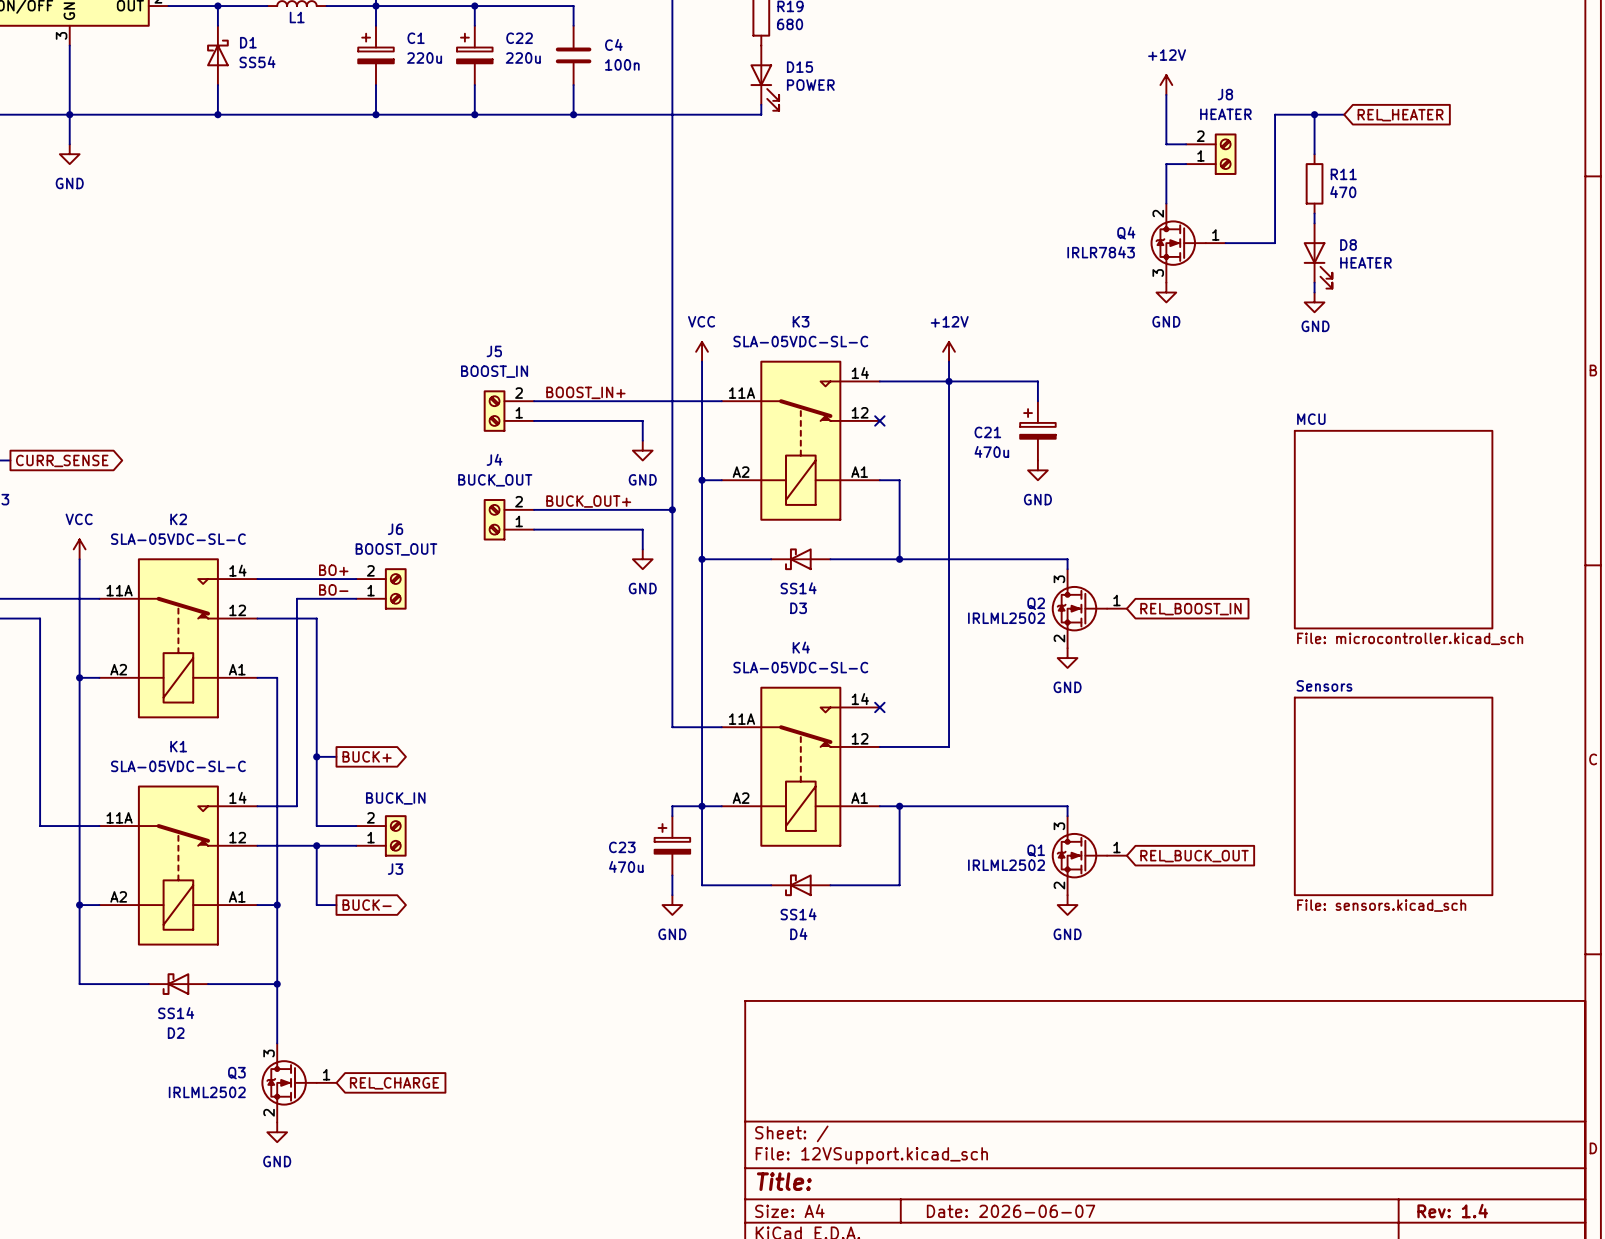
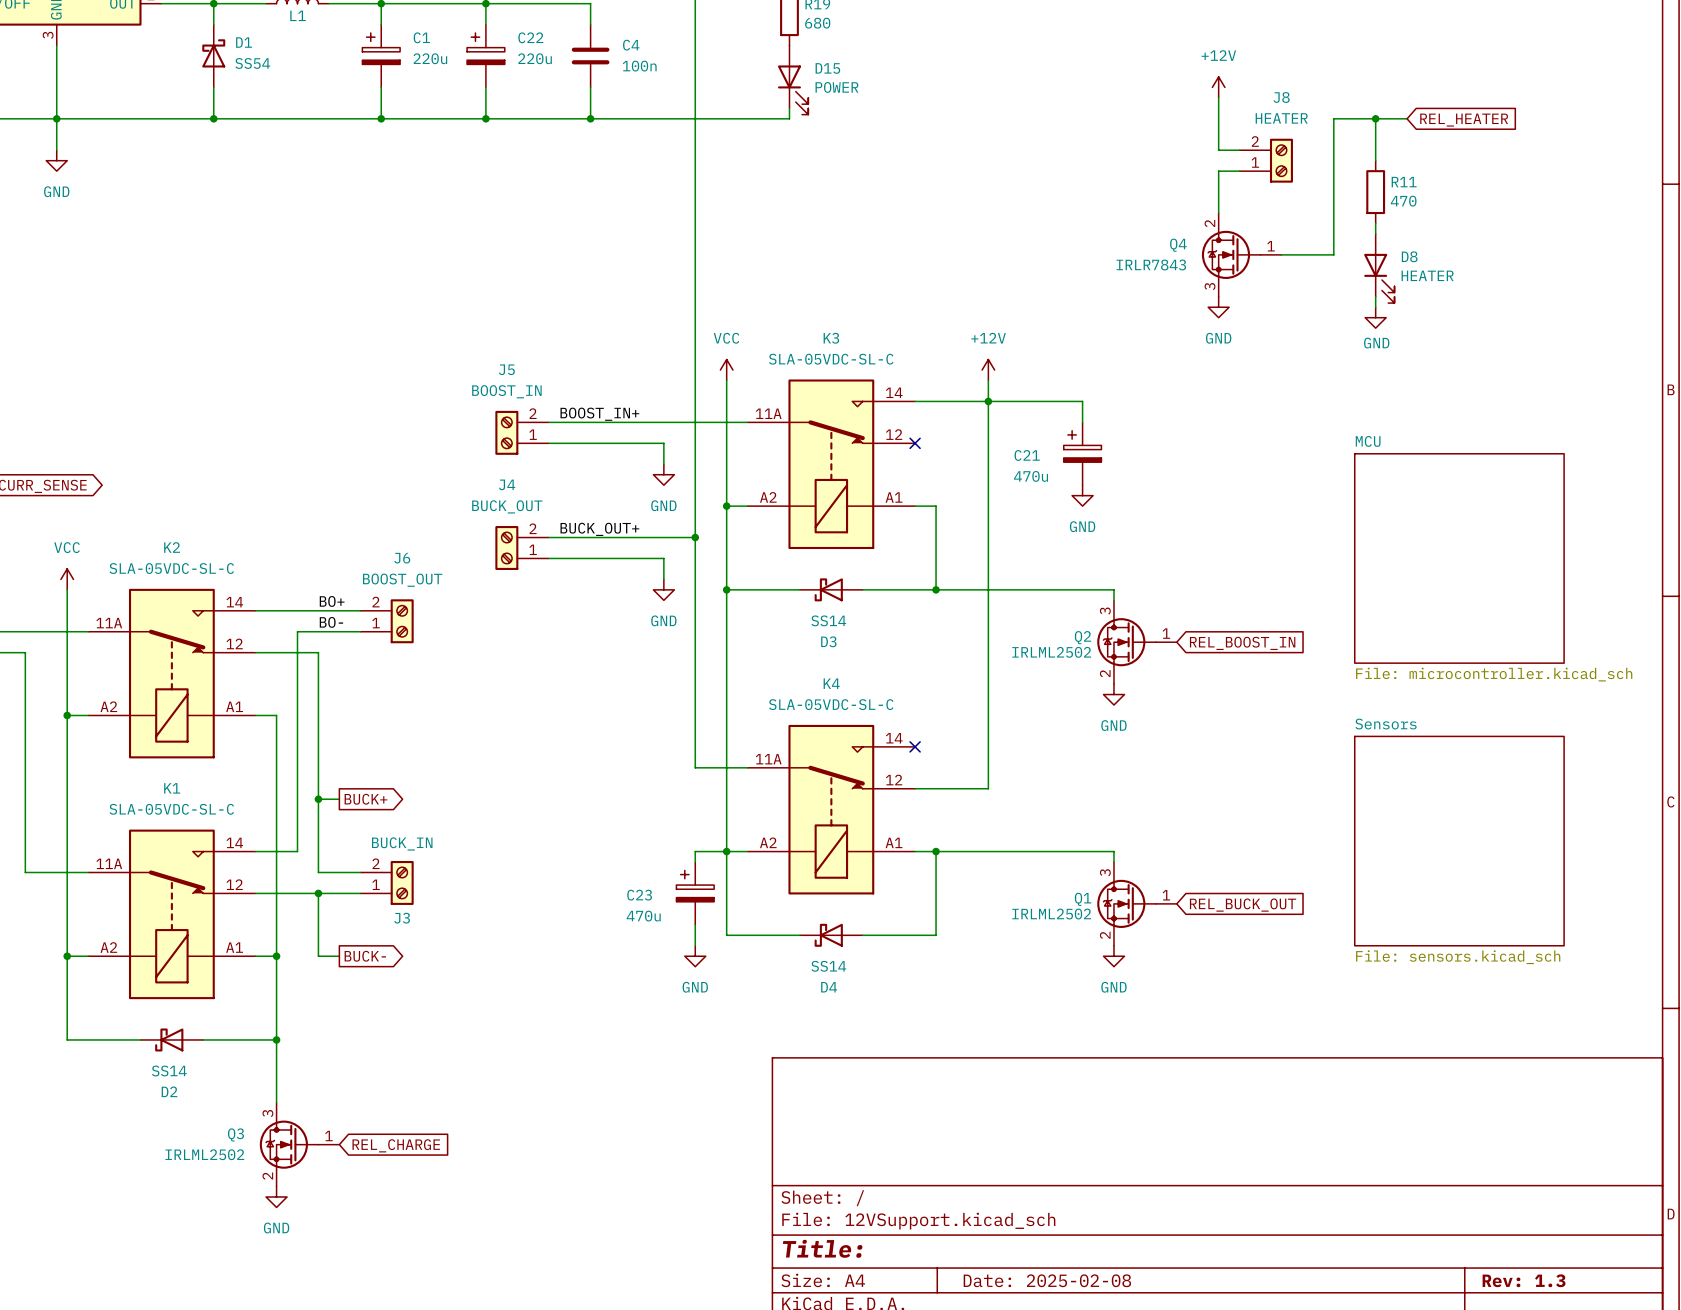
title block: Date: 2026-06-07 (1011, 1211) -> Date: 2025-02-08 (1047, 1280)
title block: Rev: 1.4 (1452, 1211) -> Rev: 1.3 (1524, 1280)

